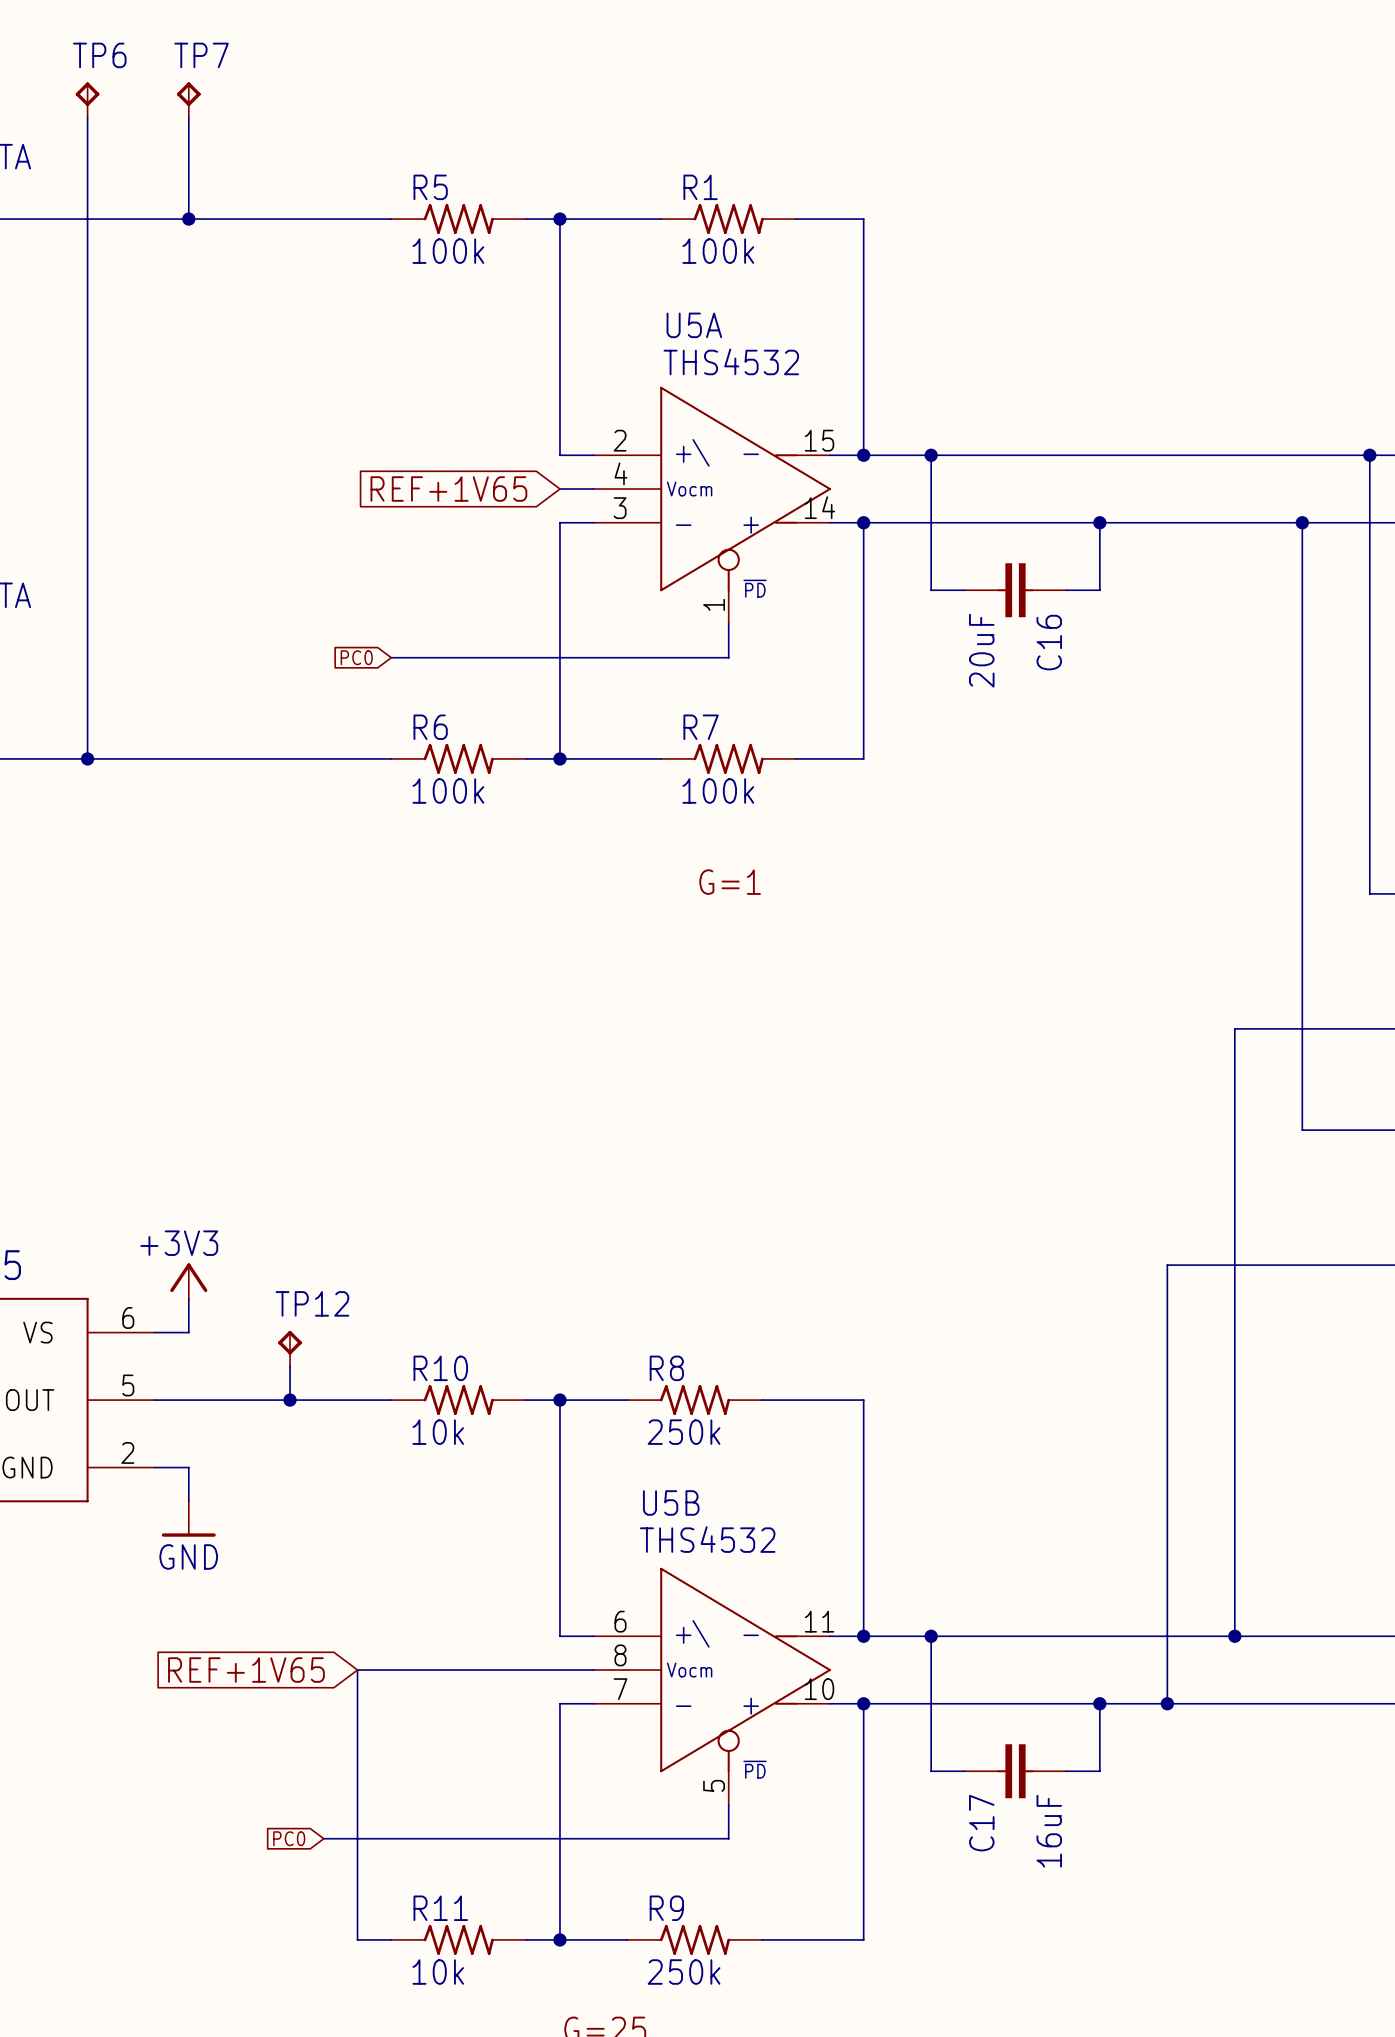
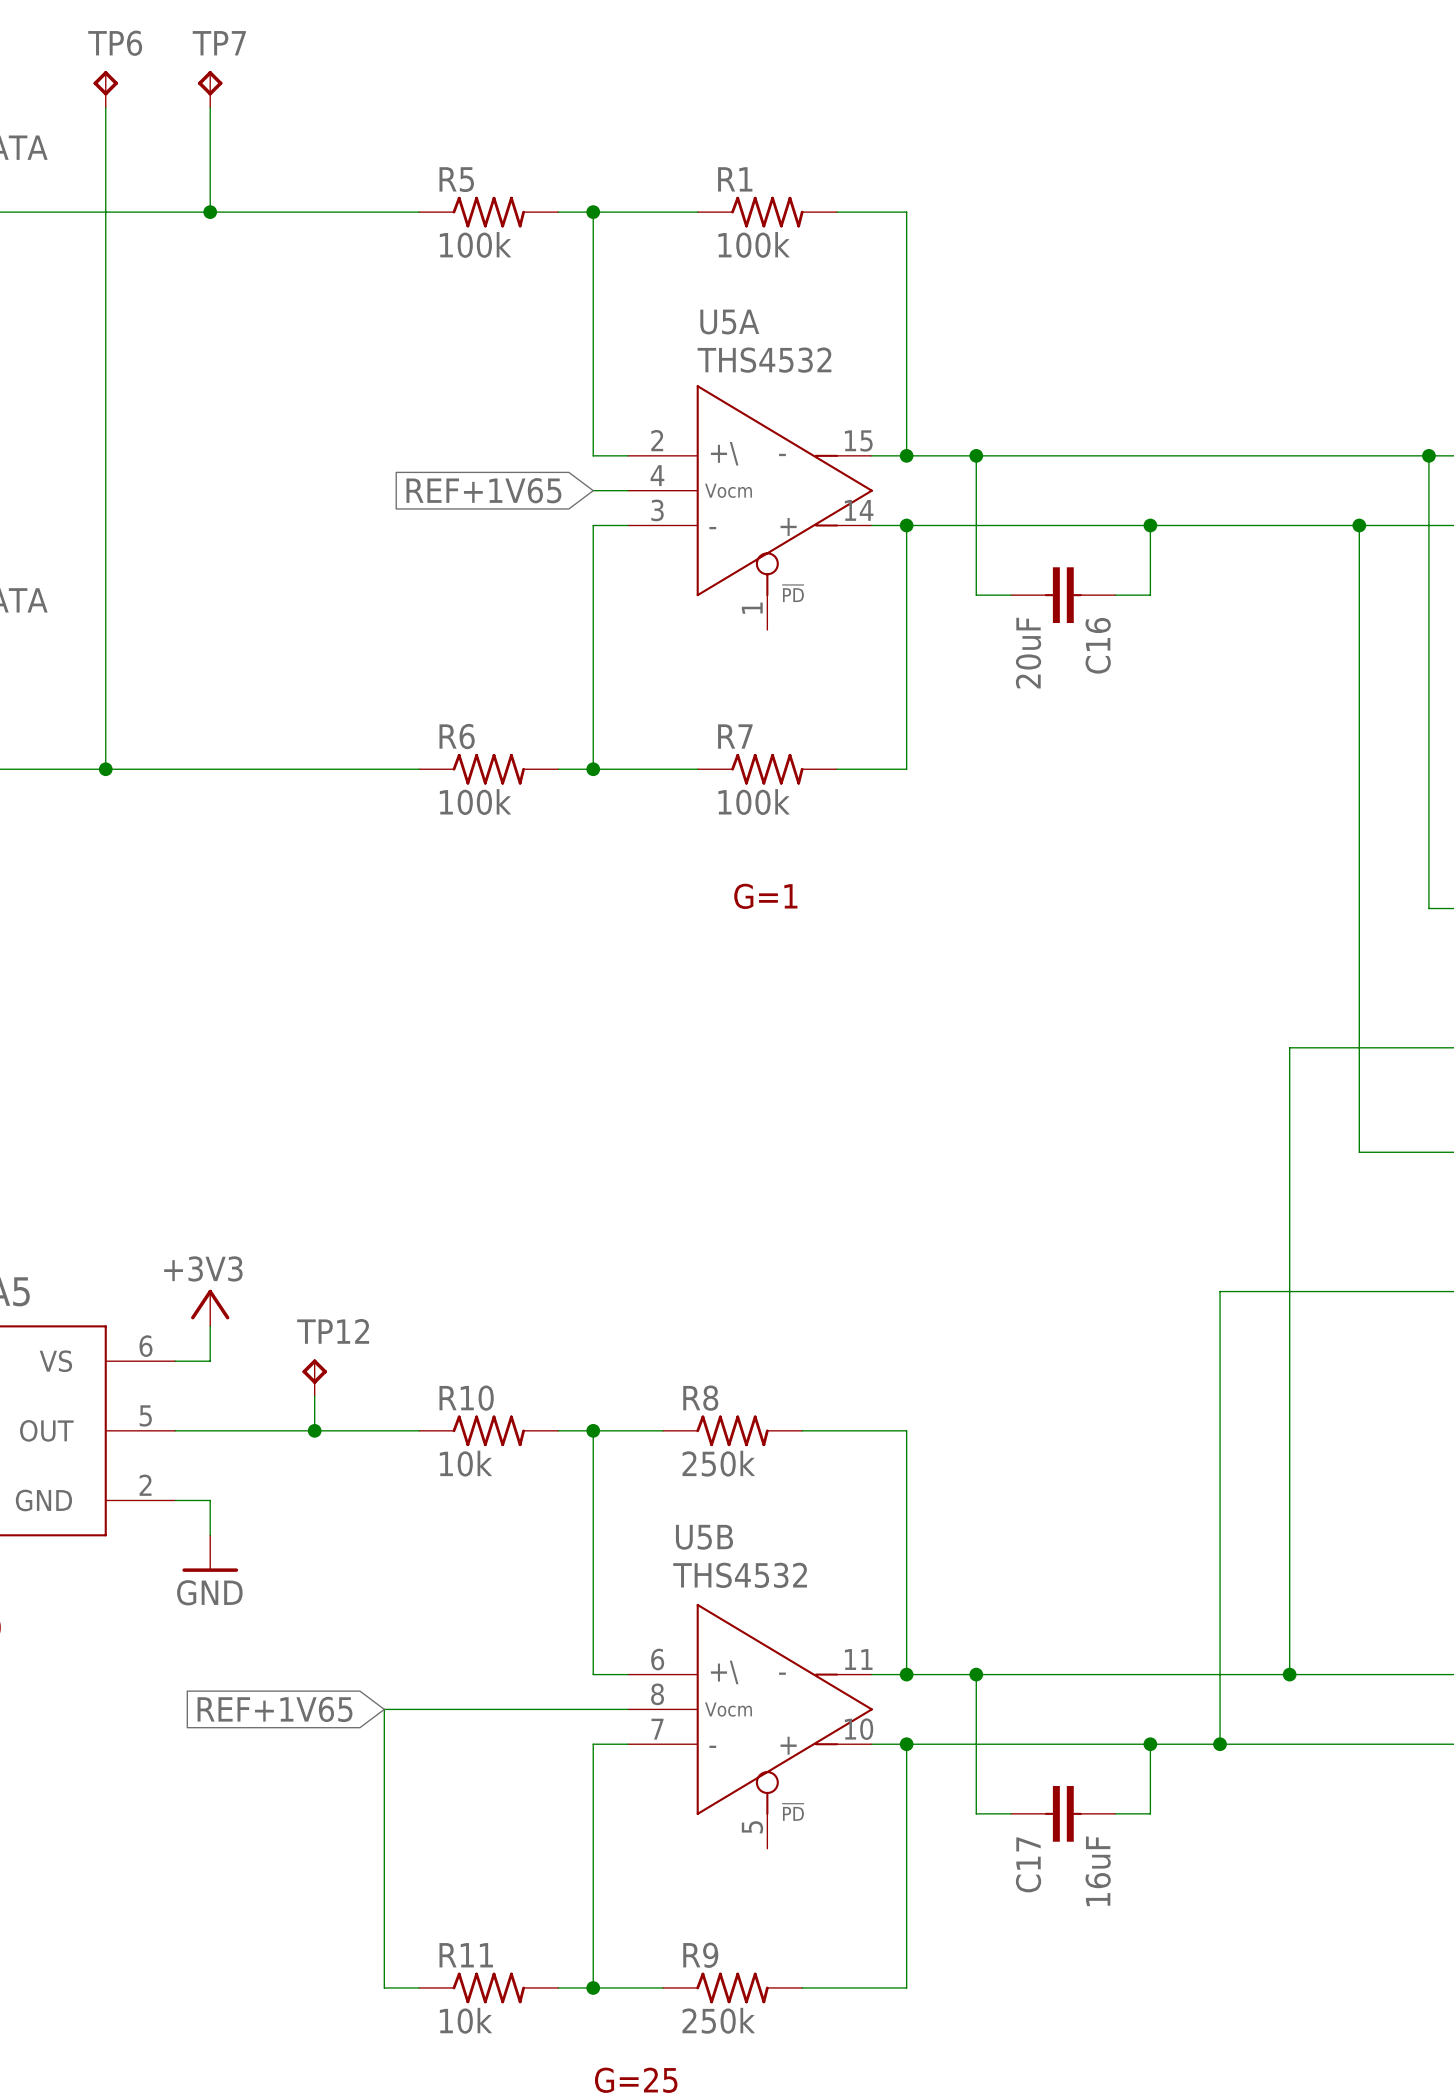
wire: (728, 623) (728, 657) (391, 657) -> none
global label: PC0 (356, 657) -> none
wire: (728, 1804) (728, 1838) (323, 1838) -> none
global label: PC0 (289, 1838) -> none

